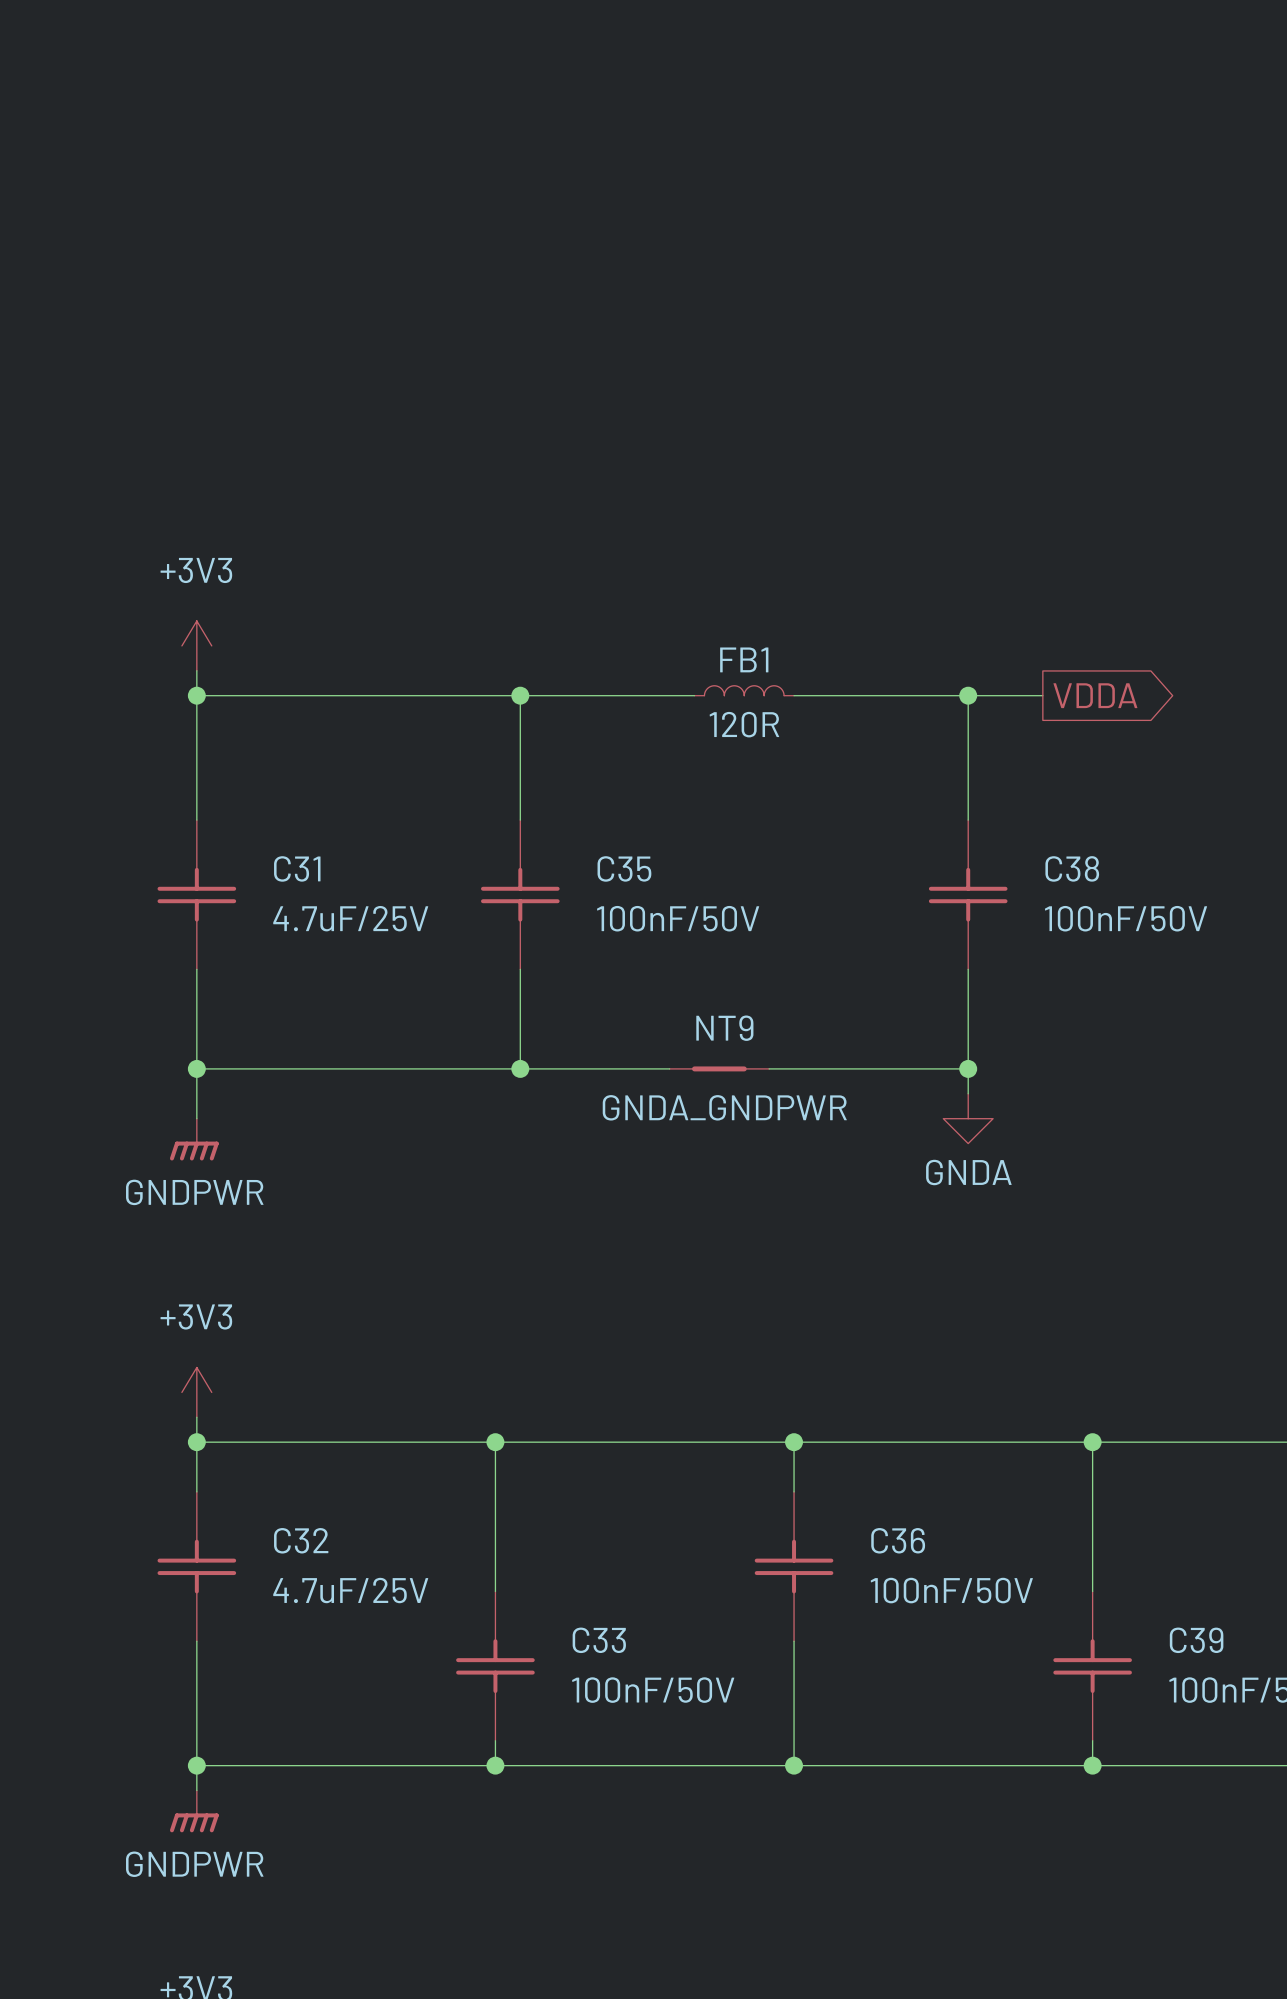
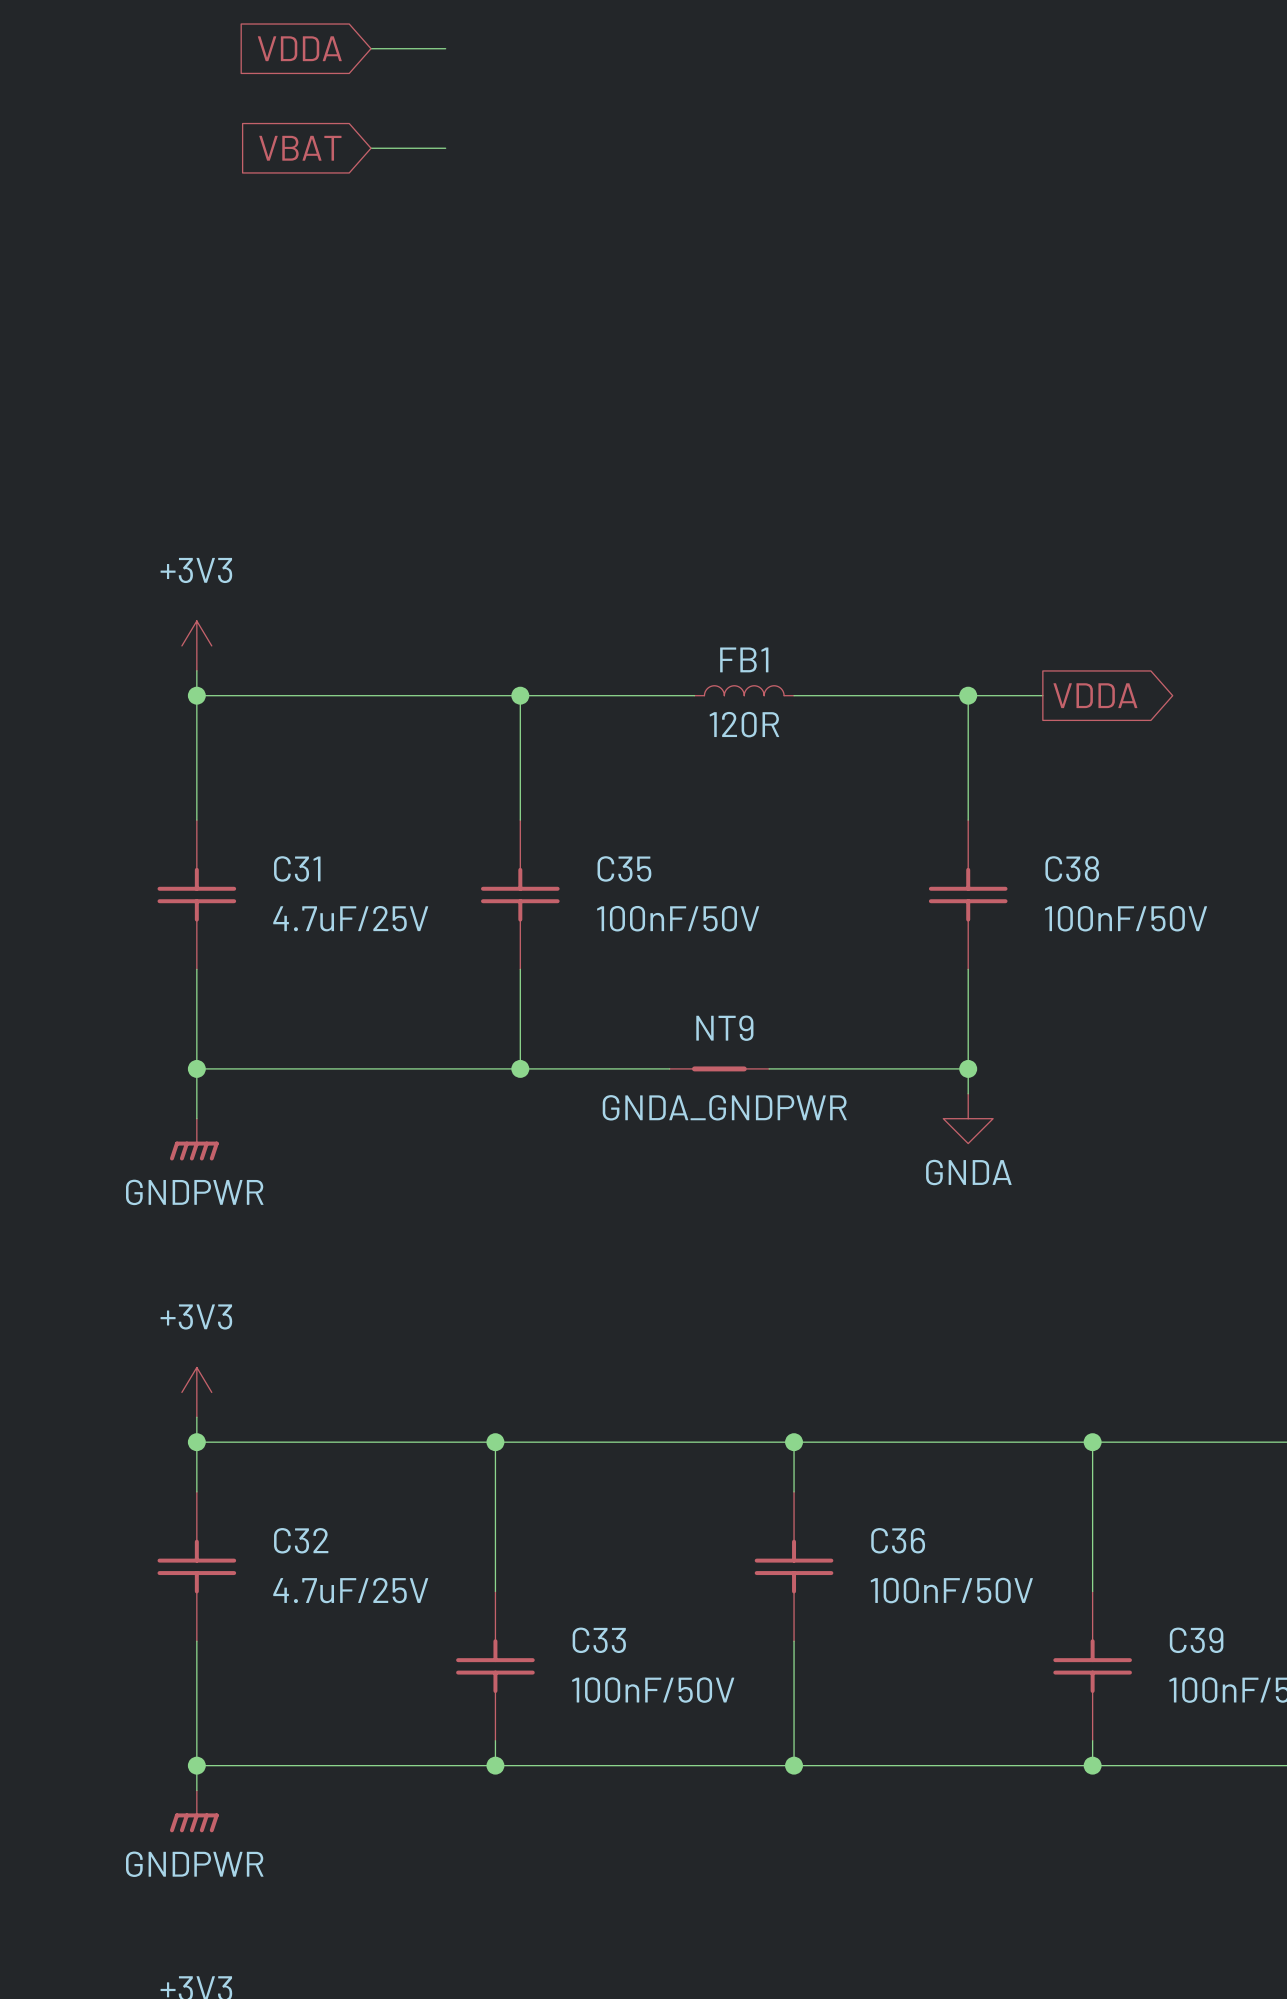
global label: none -> VDDA (299, 48)
wire: none -> (371, 48) (445, 48)
global label: none -> VBAT (300, 148)
wire: none -> (371, 148) (445, 148)

